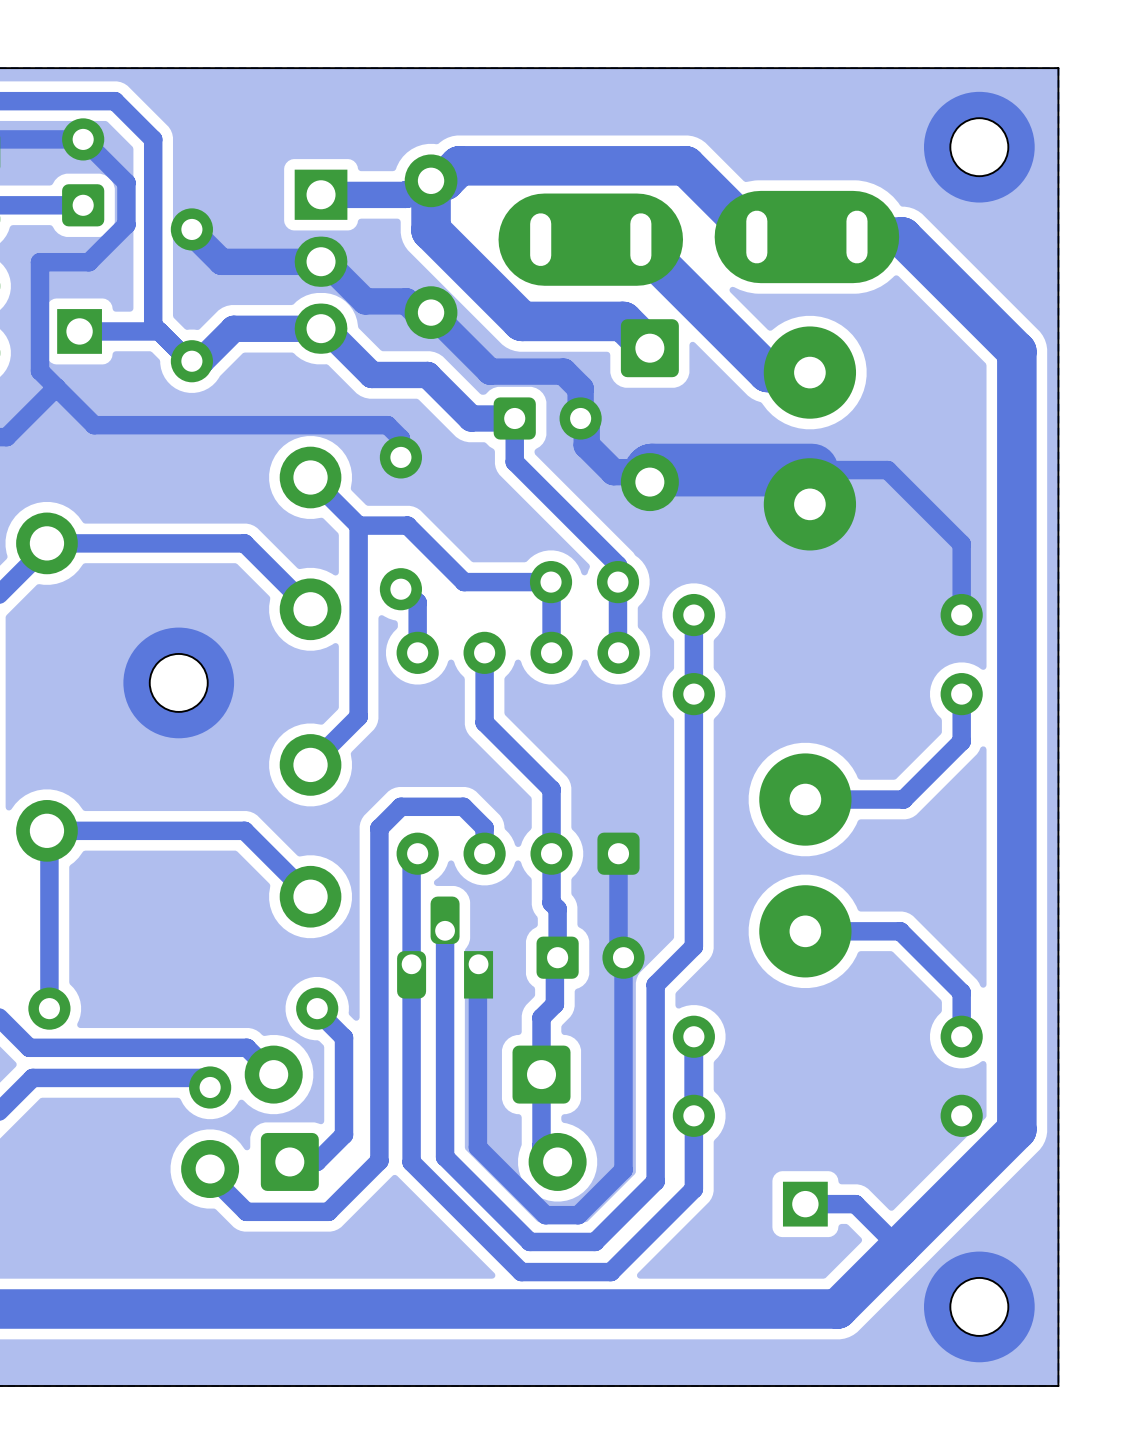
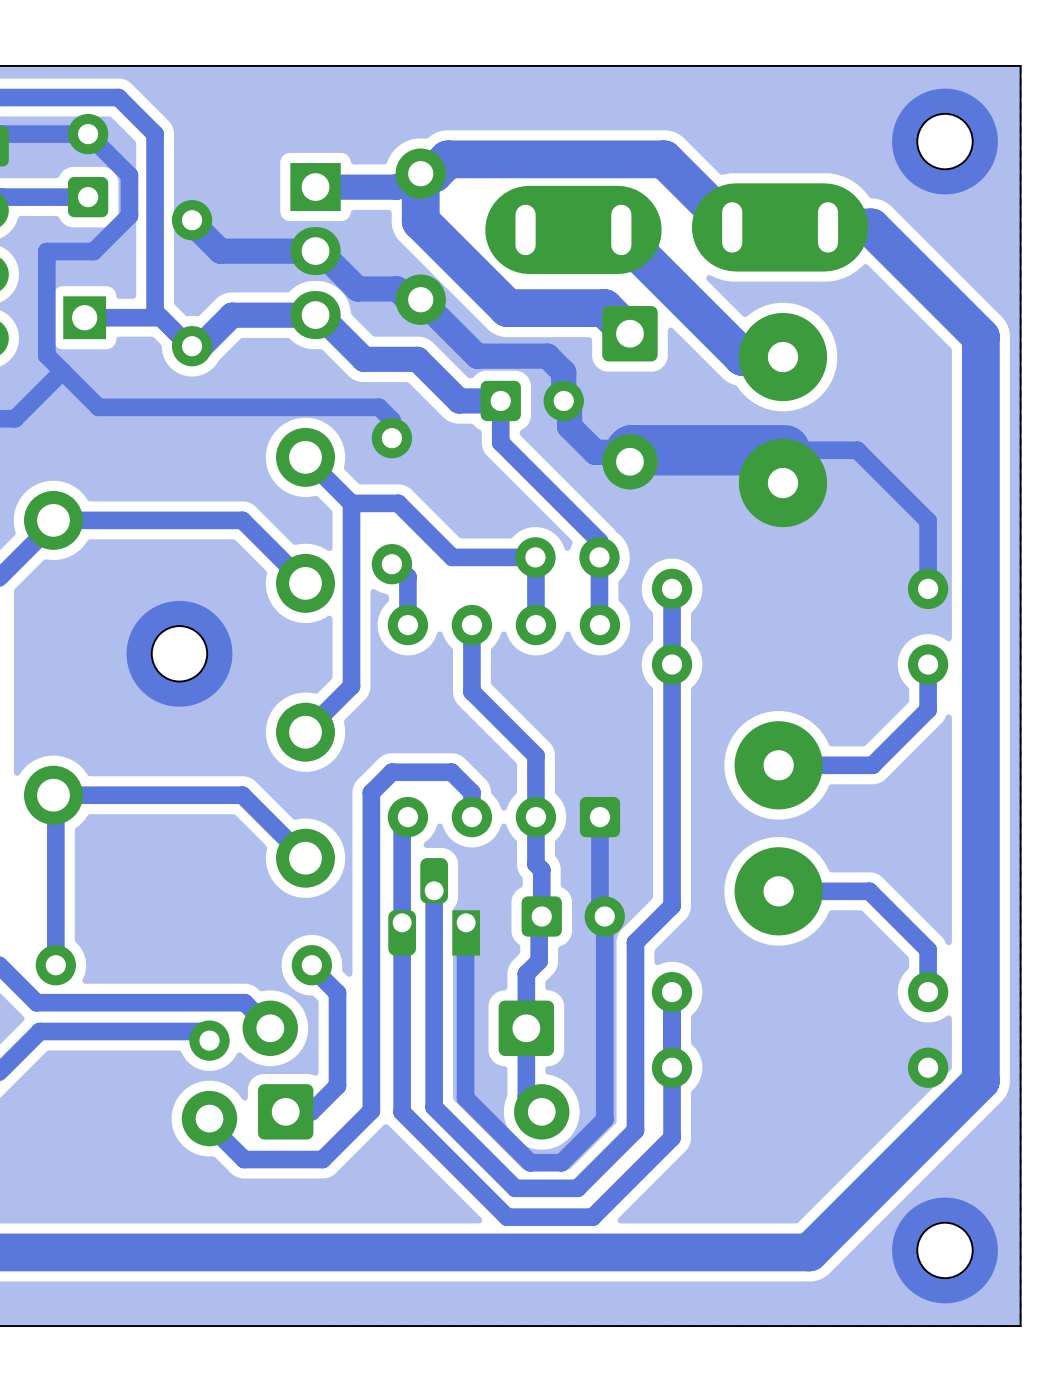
track: (805, 1204) (855, 1204) (898, 1247) -> none
part: (805, 1204) -> none

